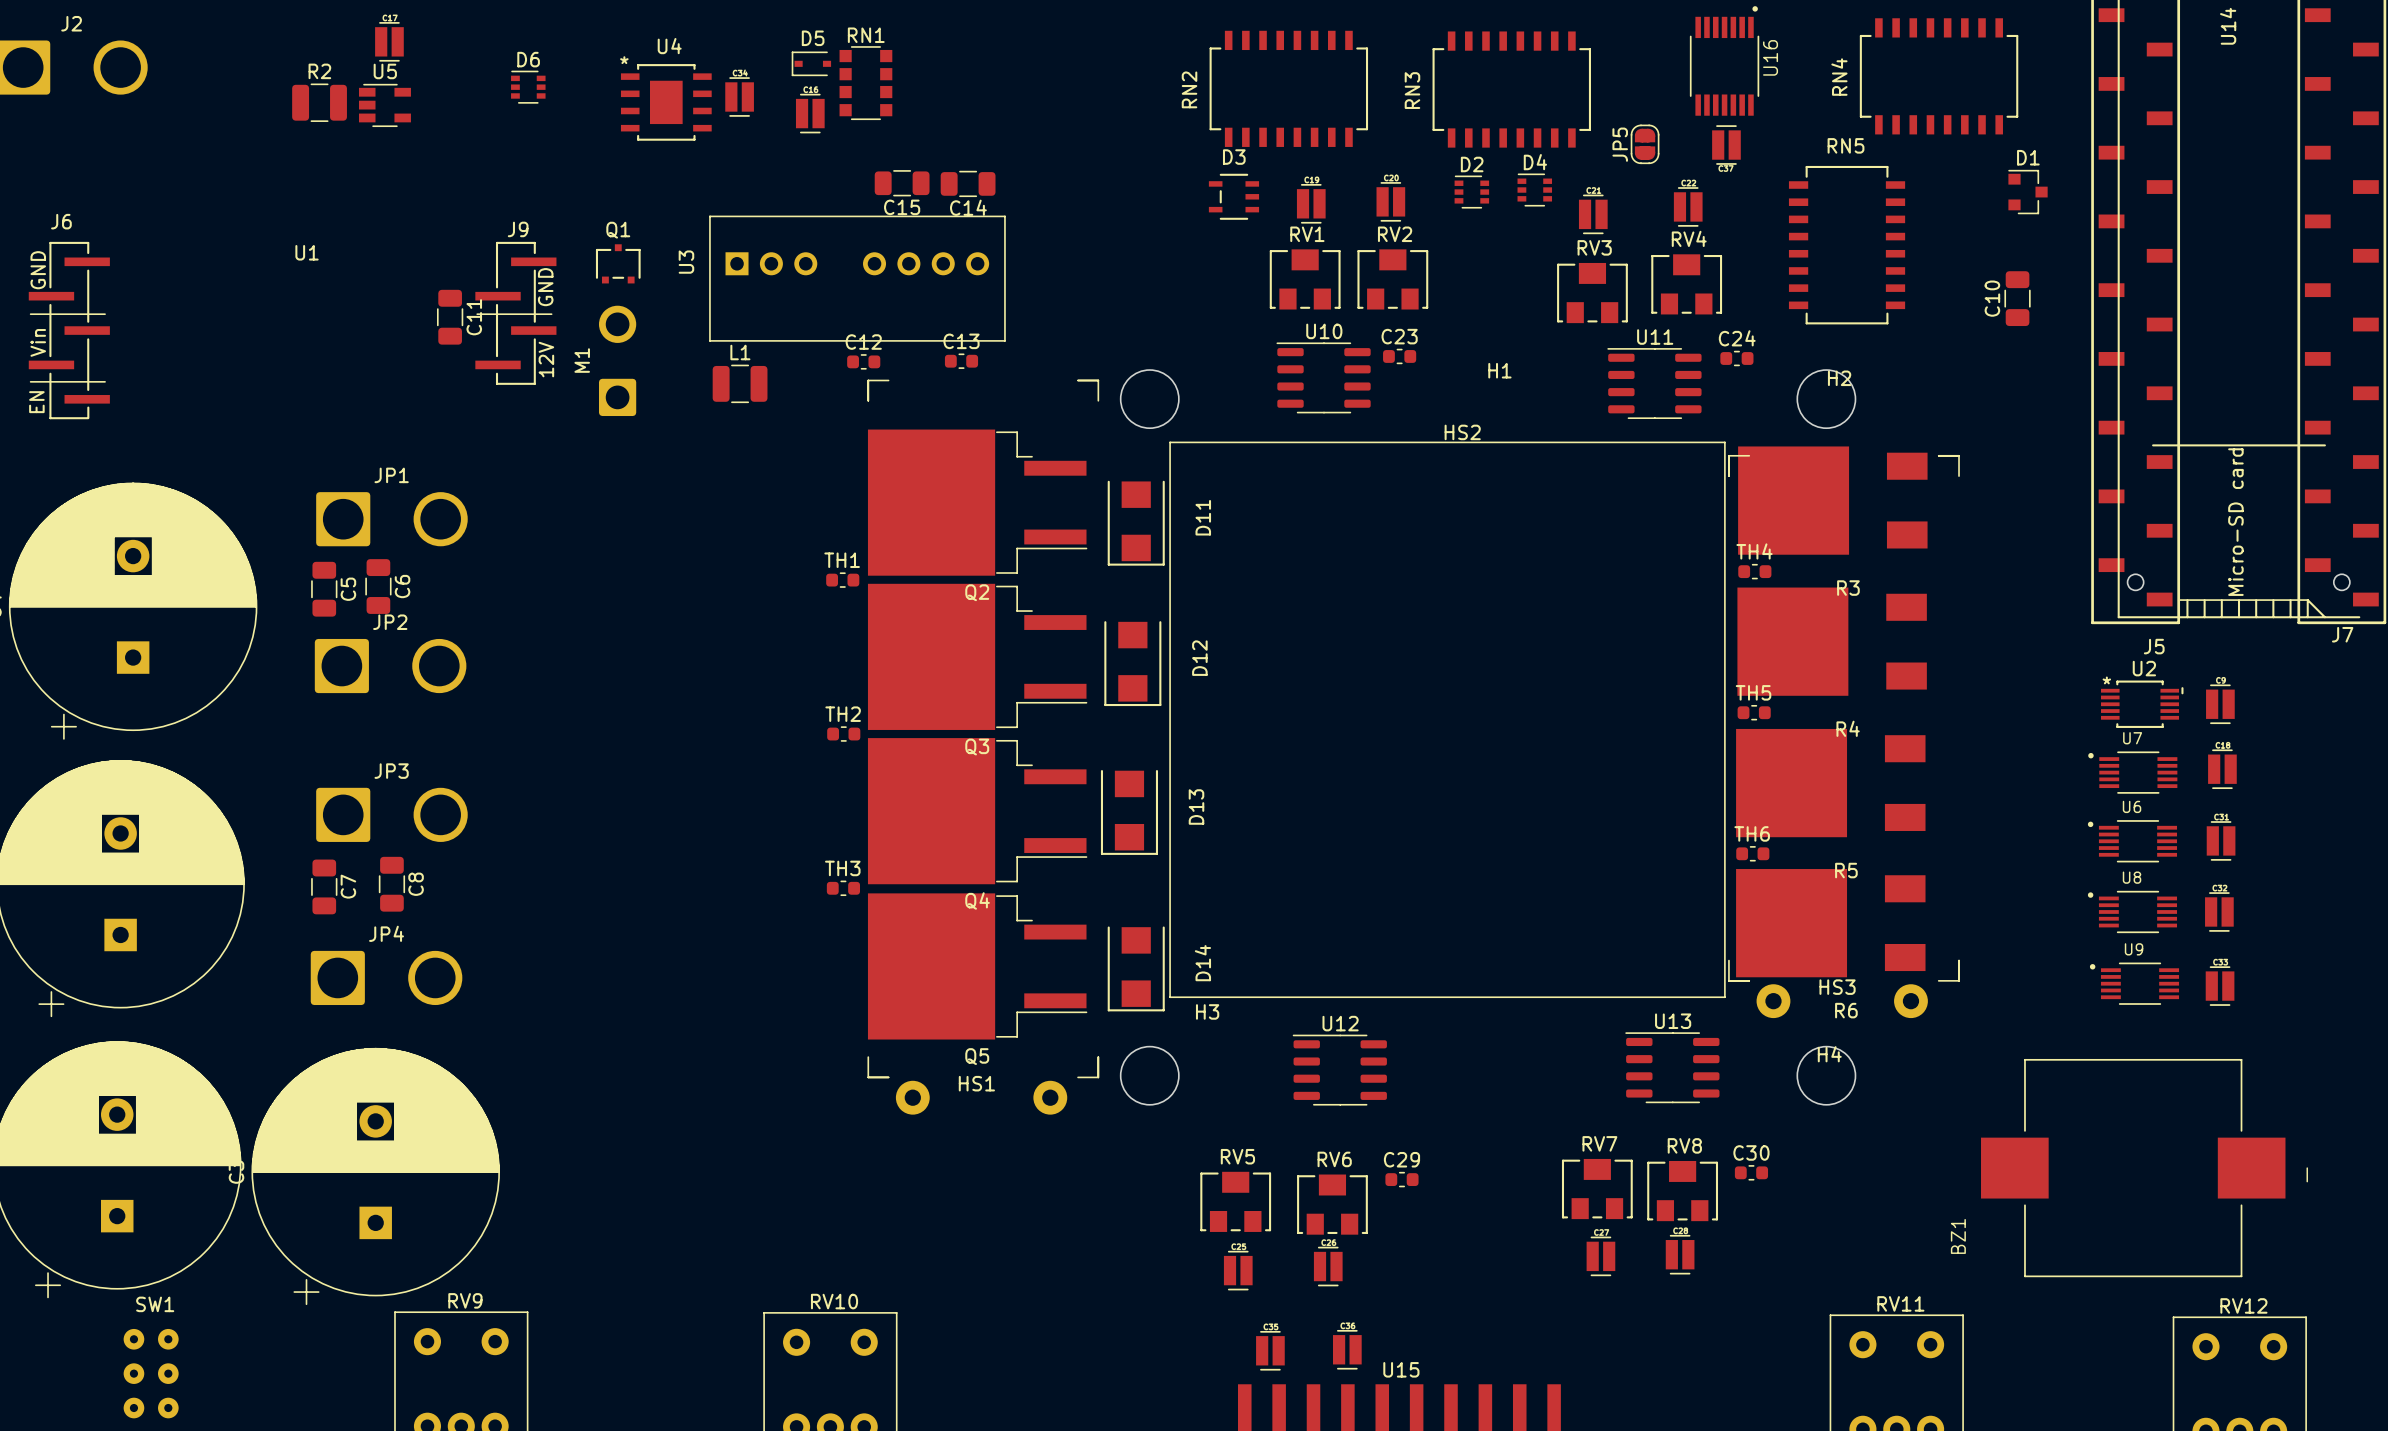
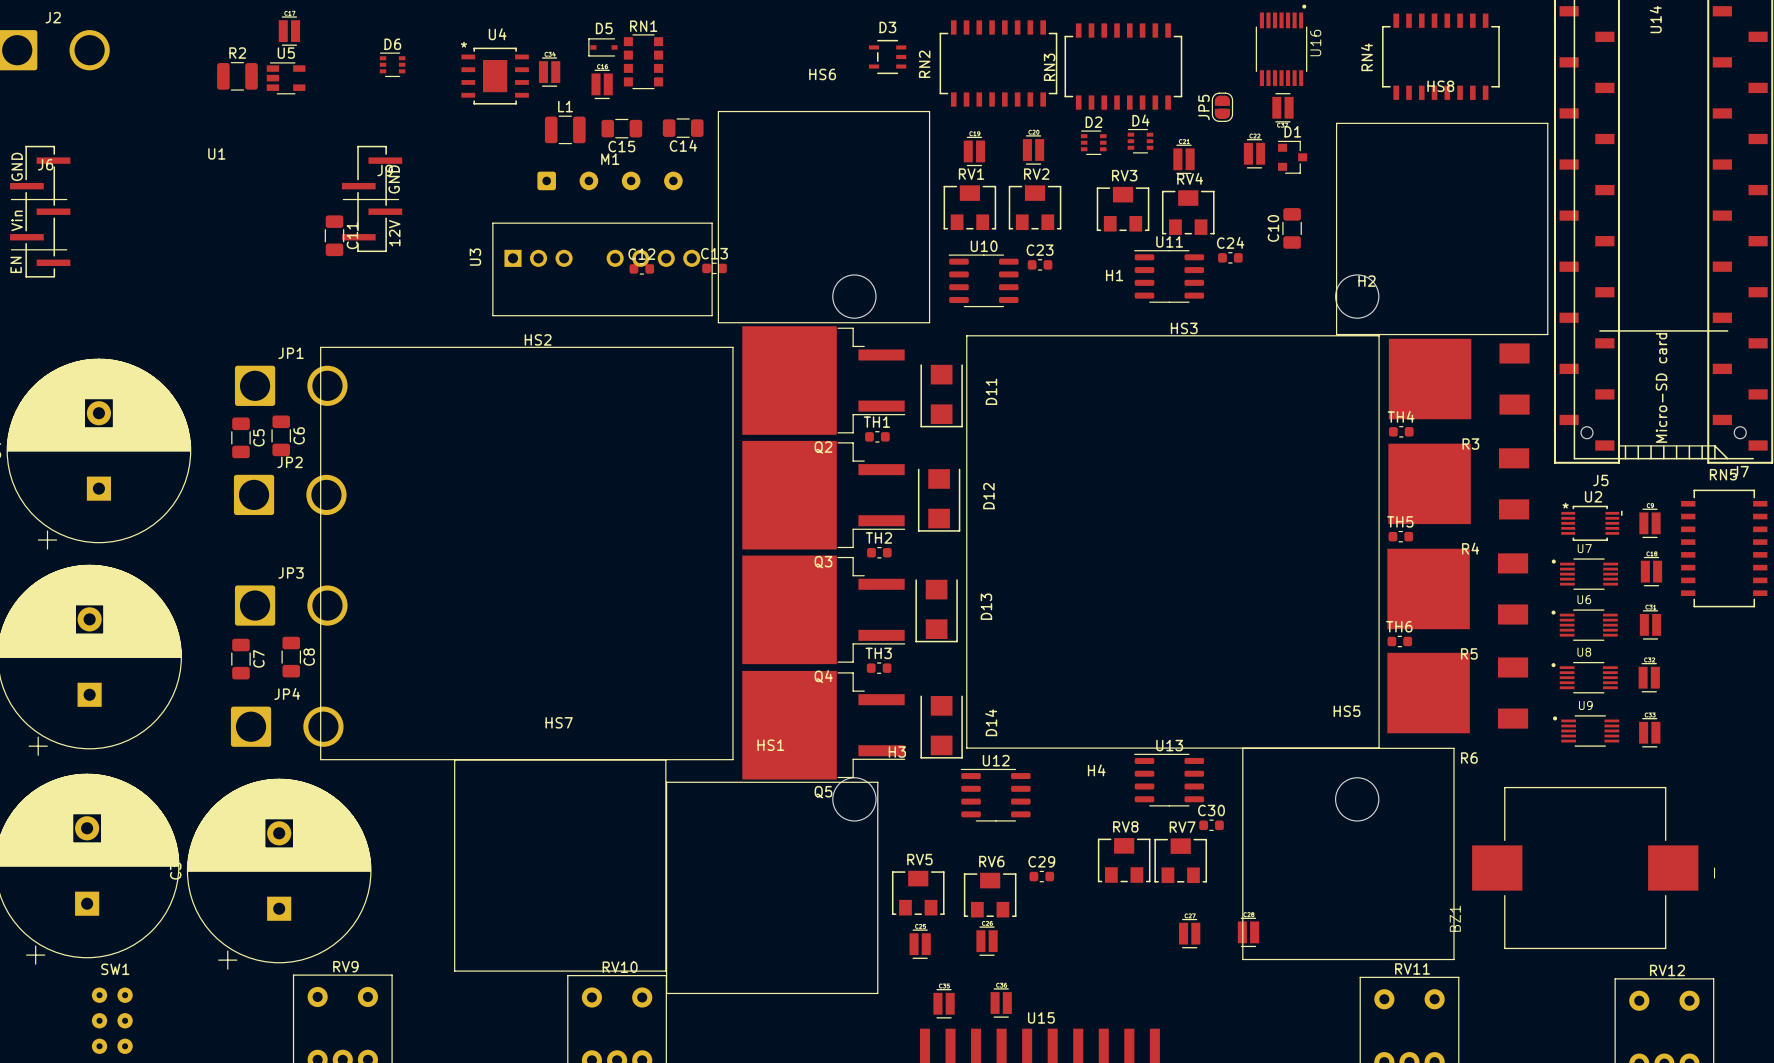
RN2 position: (1288, 88) -> (998, 63)
C15 position: (902, 183) -> (621, 128)
C14 position: (968, 183) -> (683, 128)
D1 position: (2027, 192) -> (1292, 157)
D3 position: (1233, 196) -> (887, 56)
RN5 position: (1847, 245) -> (1724, 548)
Q1: (618, 263) -> none
U3 position: (857, 278) -> (602, 269)
RV4 position: (1686, 284) -> (1188, 212)
HS6: none -> (823, 217)
RV3 position: (1592, 293) -> (1123, 209)
C10 position: (2017, 298) -> (1292, 228)
M1 footprint: [598, 305, 637, 417] -> [537, 171, 683, 191]
HS8: none -> (1442, 228)
U1 position: (292, 330) -> (206, 211)
C24 position: (1736, 358) -> (1230, 257)
M1 name position: M1 (582, 360) -> M1 (610, 159)
HS1 footprint: [867, 379, 1100, 1115] -> [666, 781, 879, 995]
L1 position: (740, 383) -> (565, 129)
U11 position: (1654, 383) -> (1169, 276)
HS3 footprint: [1728, 454, 1960, 1019] -> [966, 335, 1380, 749]
R3 position: (1832, 500) -> (1459, 379)
Q2 position: (977, 502) -> (823, 380)
D11 position: (1136, 523) -> (941, 395)
TH4 position: (1754, 571) -> (1401, 431)
TH1 position: (842, 580) -> (877, 436)
R4 position: (1832, 641) -> (1458, 483)
Q3 position: (977, 656) -> (823, 495)
D12 position: (1132, 663) -> (939, 500)
TH5 position: (1754, 712) -> (1400, 536)
HS2 position: (1447, 719) -> (526, 553)
TH2 position: (843, 734) -> (879, 552)
R5 position: (1830, 783) -> (1457, 588)
Q4 position: (977, 811) -> (823, 609)
D13 position: (1129, 812) -> (936, 610)
TH6 position: (1752, 853) -> (1399, 641)
TH3 position: (843, 888) -> (879, 668)
R6 position: (1830, 923) -> (1457, 693)
Q5 position: (977, 966) -> (823, 725)
D14 position: (1136, 968) -> (941, 727)
HS3 name position: HS3 (1837, 987) -> HS3 (1184, 328)
H4 position: (1829, 1054) -> (1096, 770)
U13 position: (1672, 1067) -> (1169, 780)
HS1 name position: HS1 (976, 1083) -> HS1 (770, 745)
HS5: none -> (1348, 853)
HS7: none -> (560, 865)
C30 position: (1751, 1172) -> (1211, 825)
RV7 position: (1597, 1189) -> (1180, 860)
RV8 position: (1682, 1191) -> (1124, 860)

